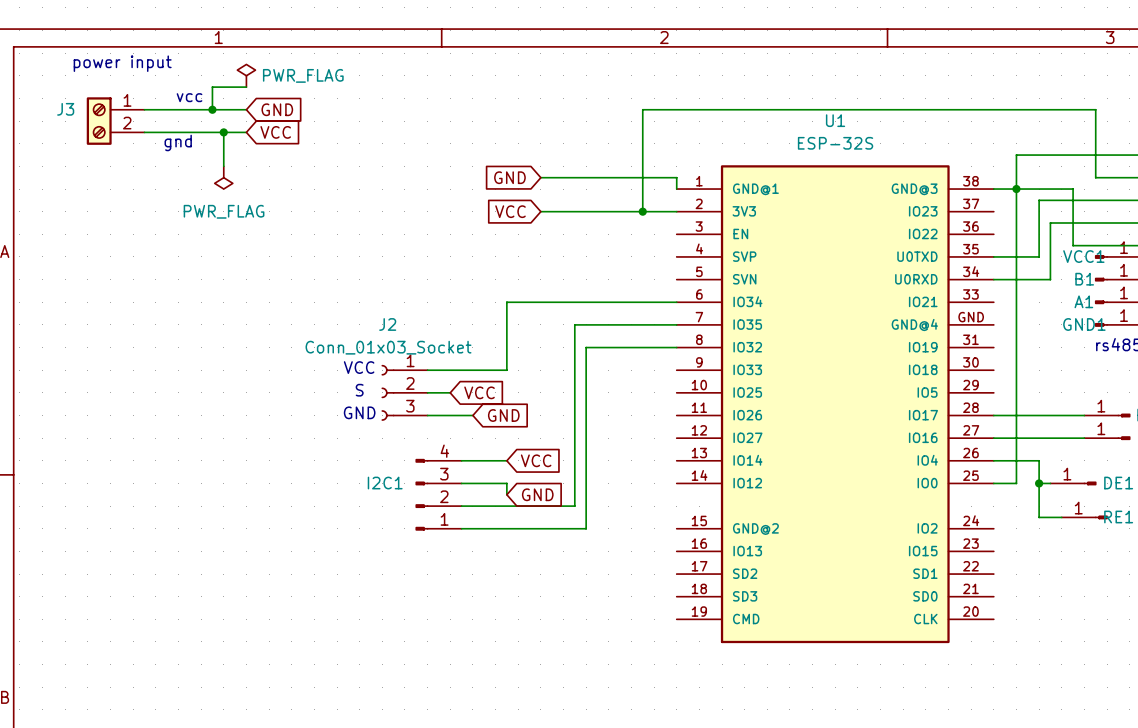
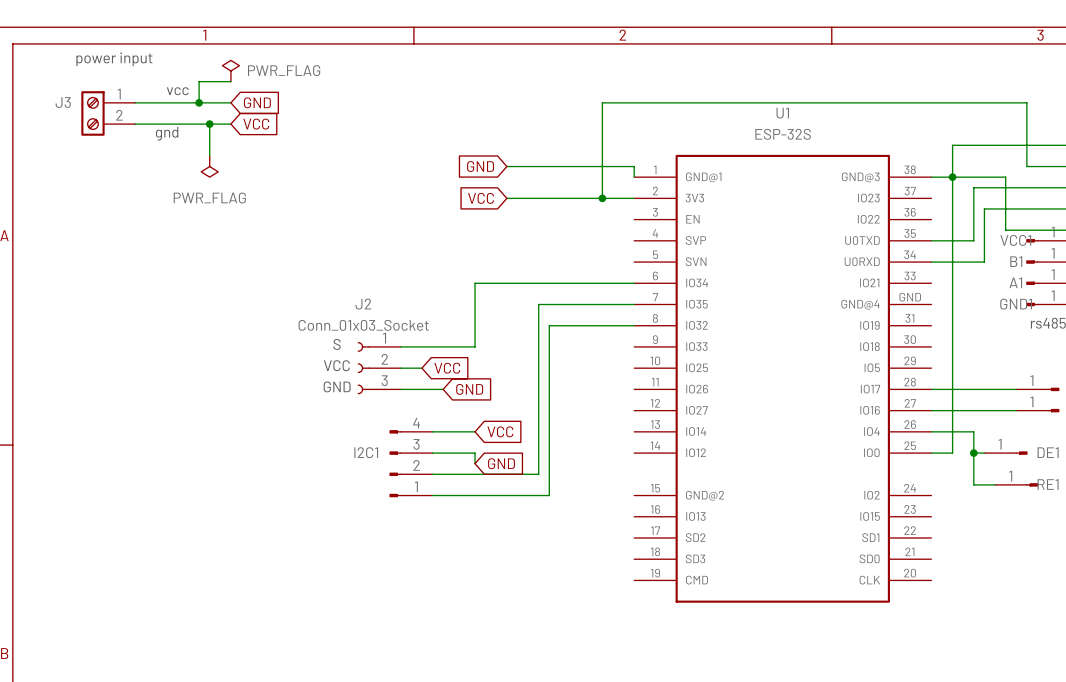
text: VCC (359, 367) -> S (337, 344)
text: S (359, 390) -> VCC (336, 365)

